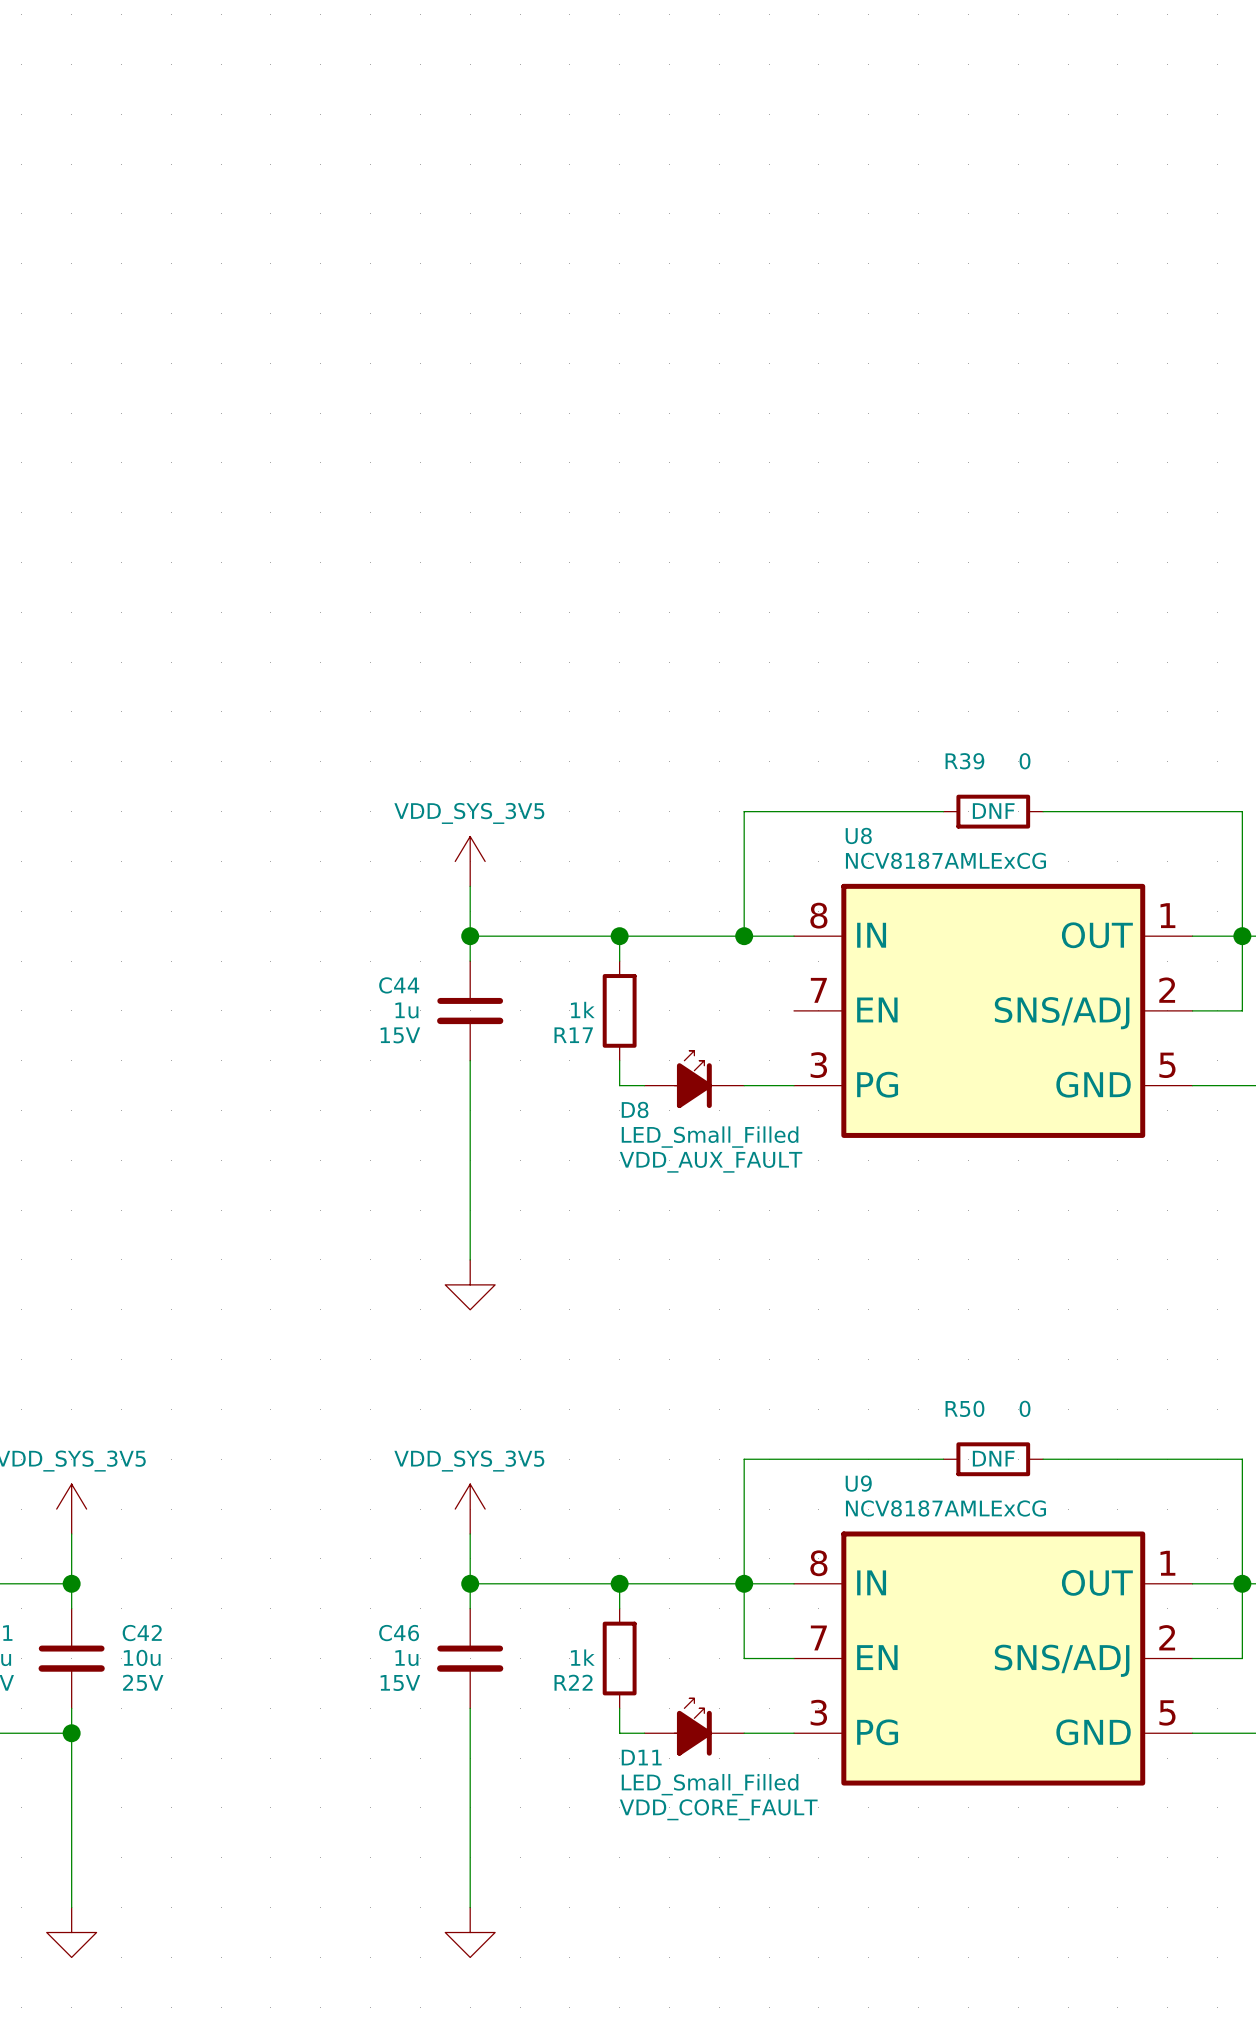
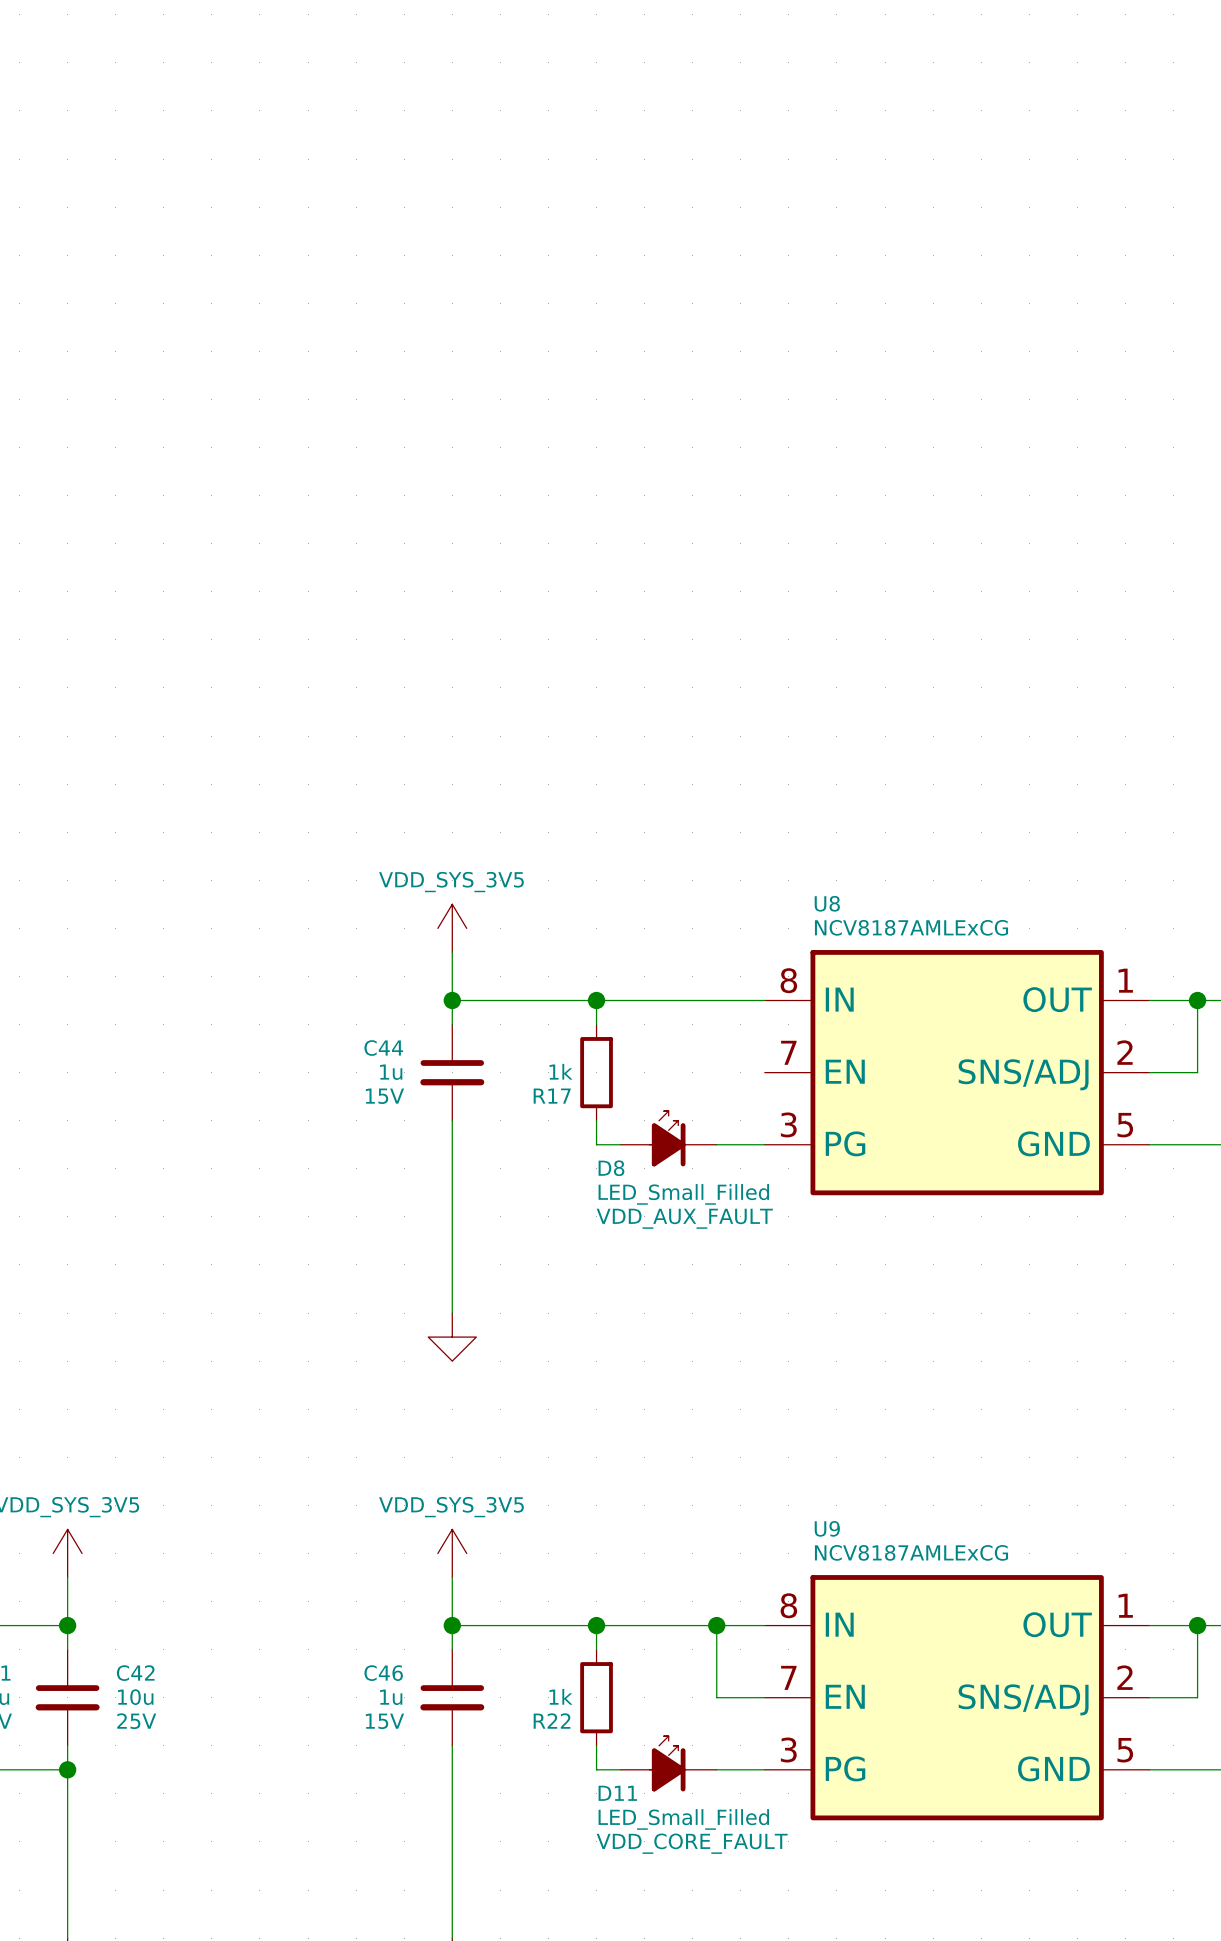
wire: (943, 811) (744, 811) (744, 936) -> none
R39: 0 (993, 811) -> none
wire: (1043, 811) (1242, 811) (1242, 936) -> none
junction: (744, 936) -> none
wire: (943, 1459) (744, 1459) (744, 1583) -> none
R50: 0 (993, 1459) -> none
wire: (1043, 1459) (1242, 1459) (1242, 1583) -> none

